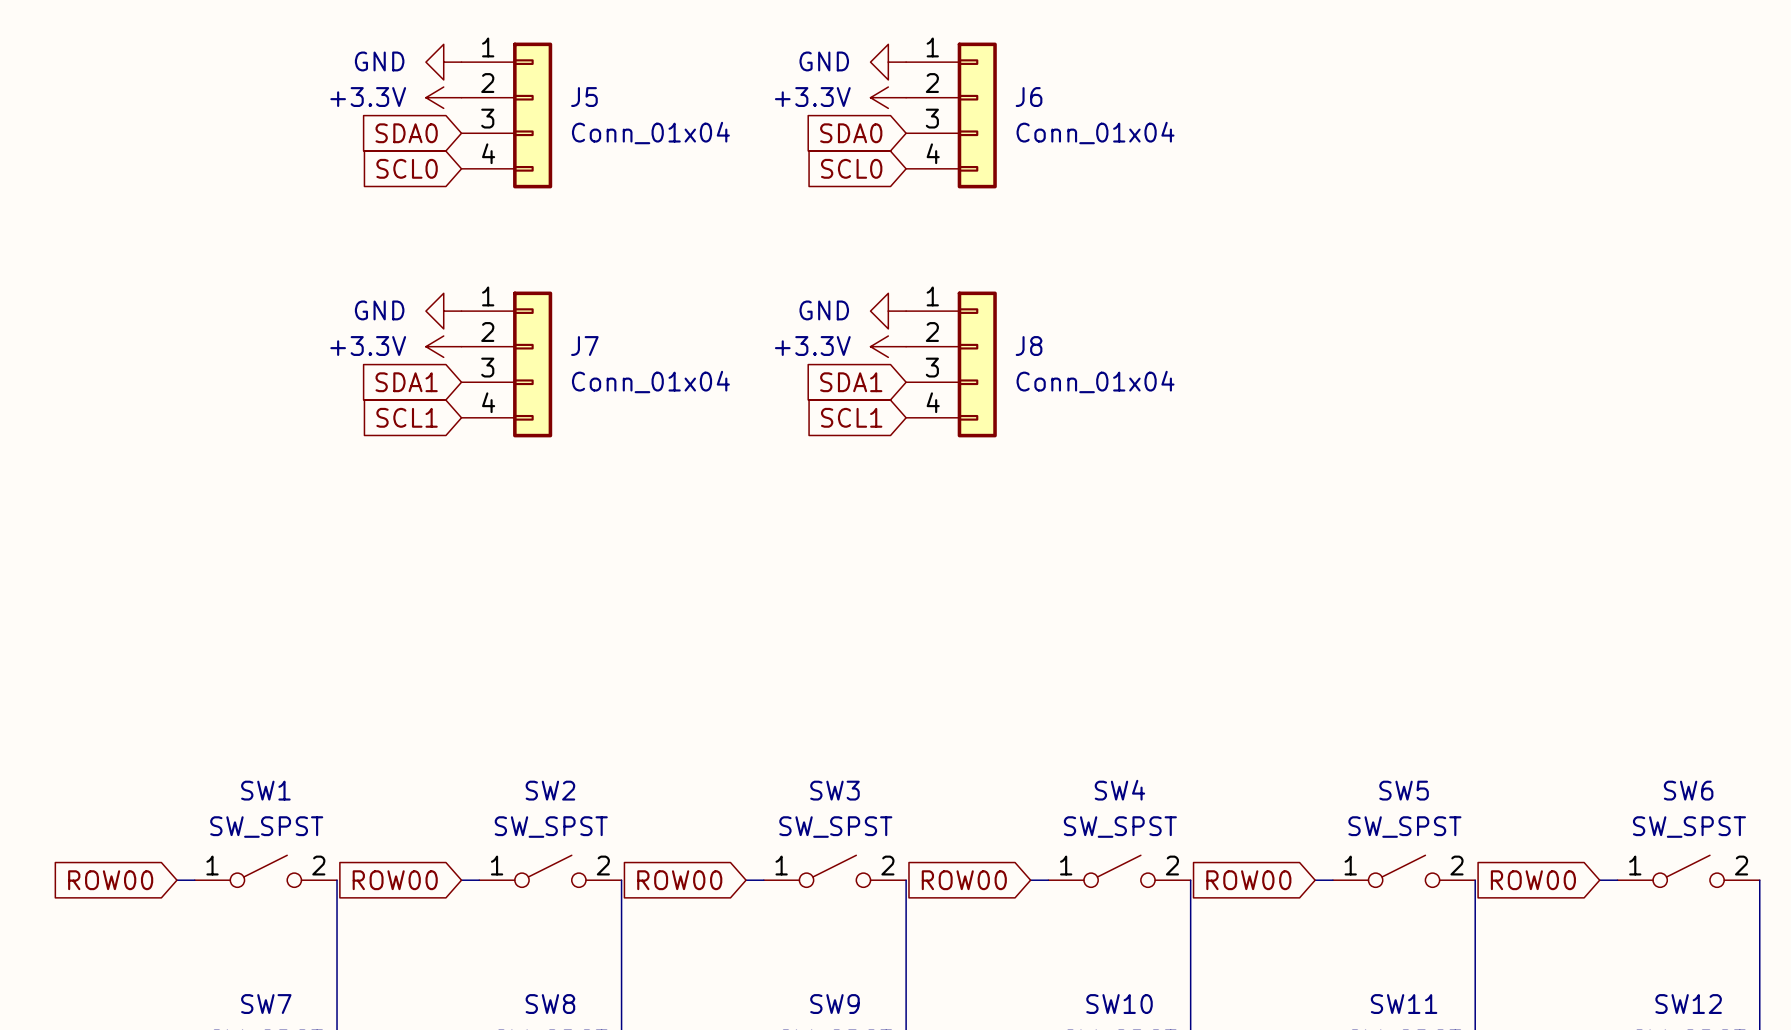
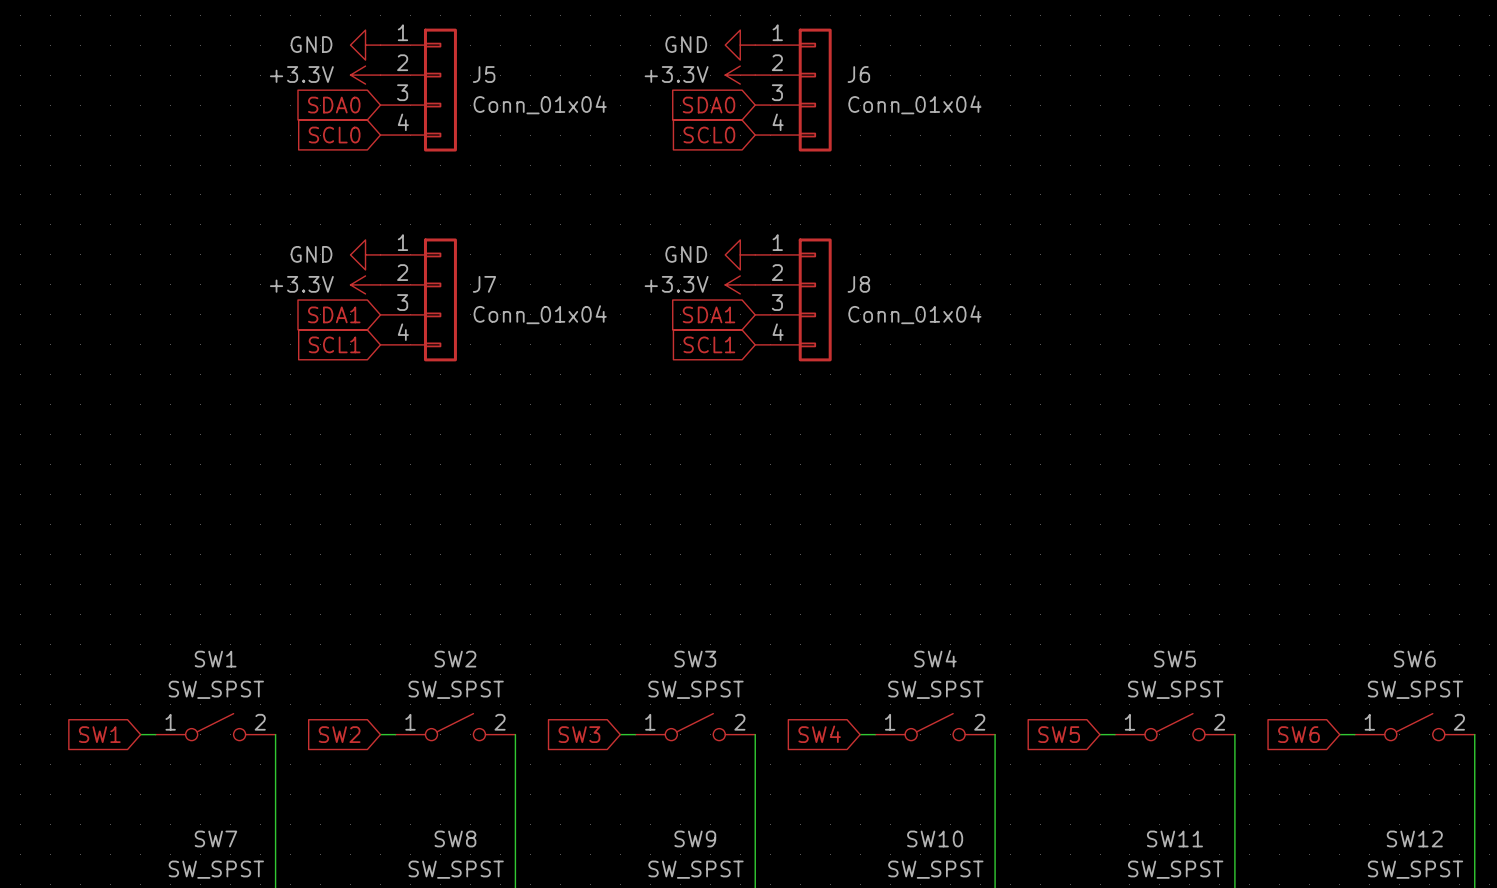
global label: ROW00 (110, 880) -> SW1 (99, 734)
global label: ROW00 (395, 880) -> SW2 (339, 734)
global label: ROW00 (679, 880) -> SW3 (579, 734)
global label: ROW00 (964, 880) -> SW4 (819, 734)
global label: ROW00 (1248, 880) -> SW5 (1059, 734)
global label: ROW00 (1533, 880) -> SW6 (1298, 734)

